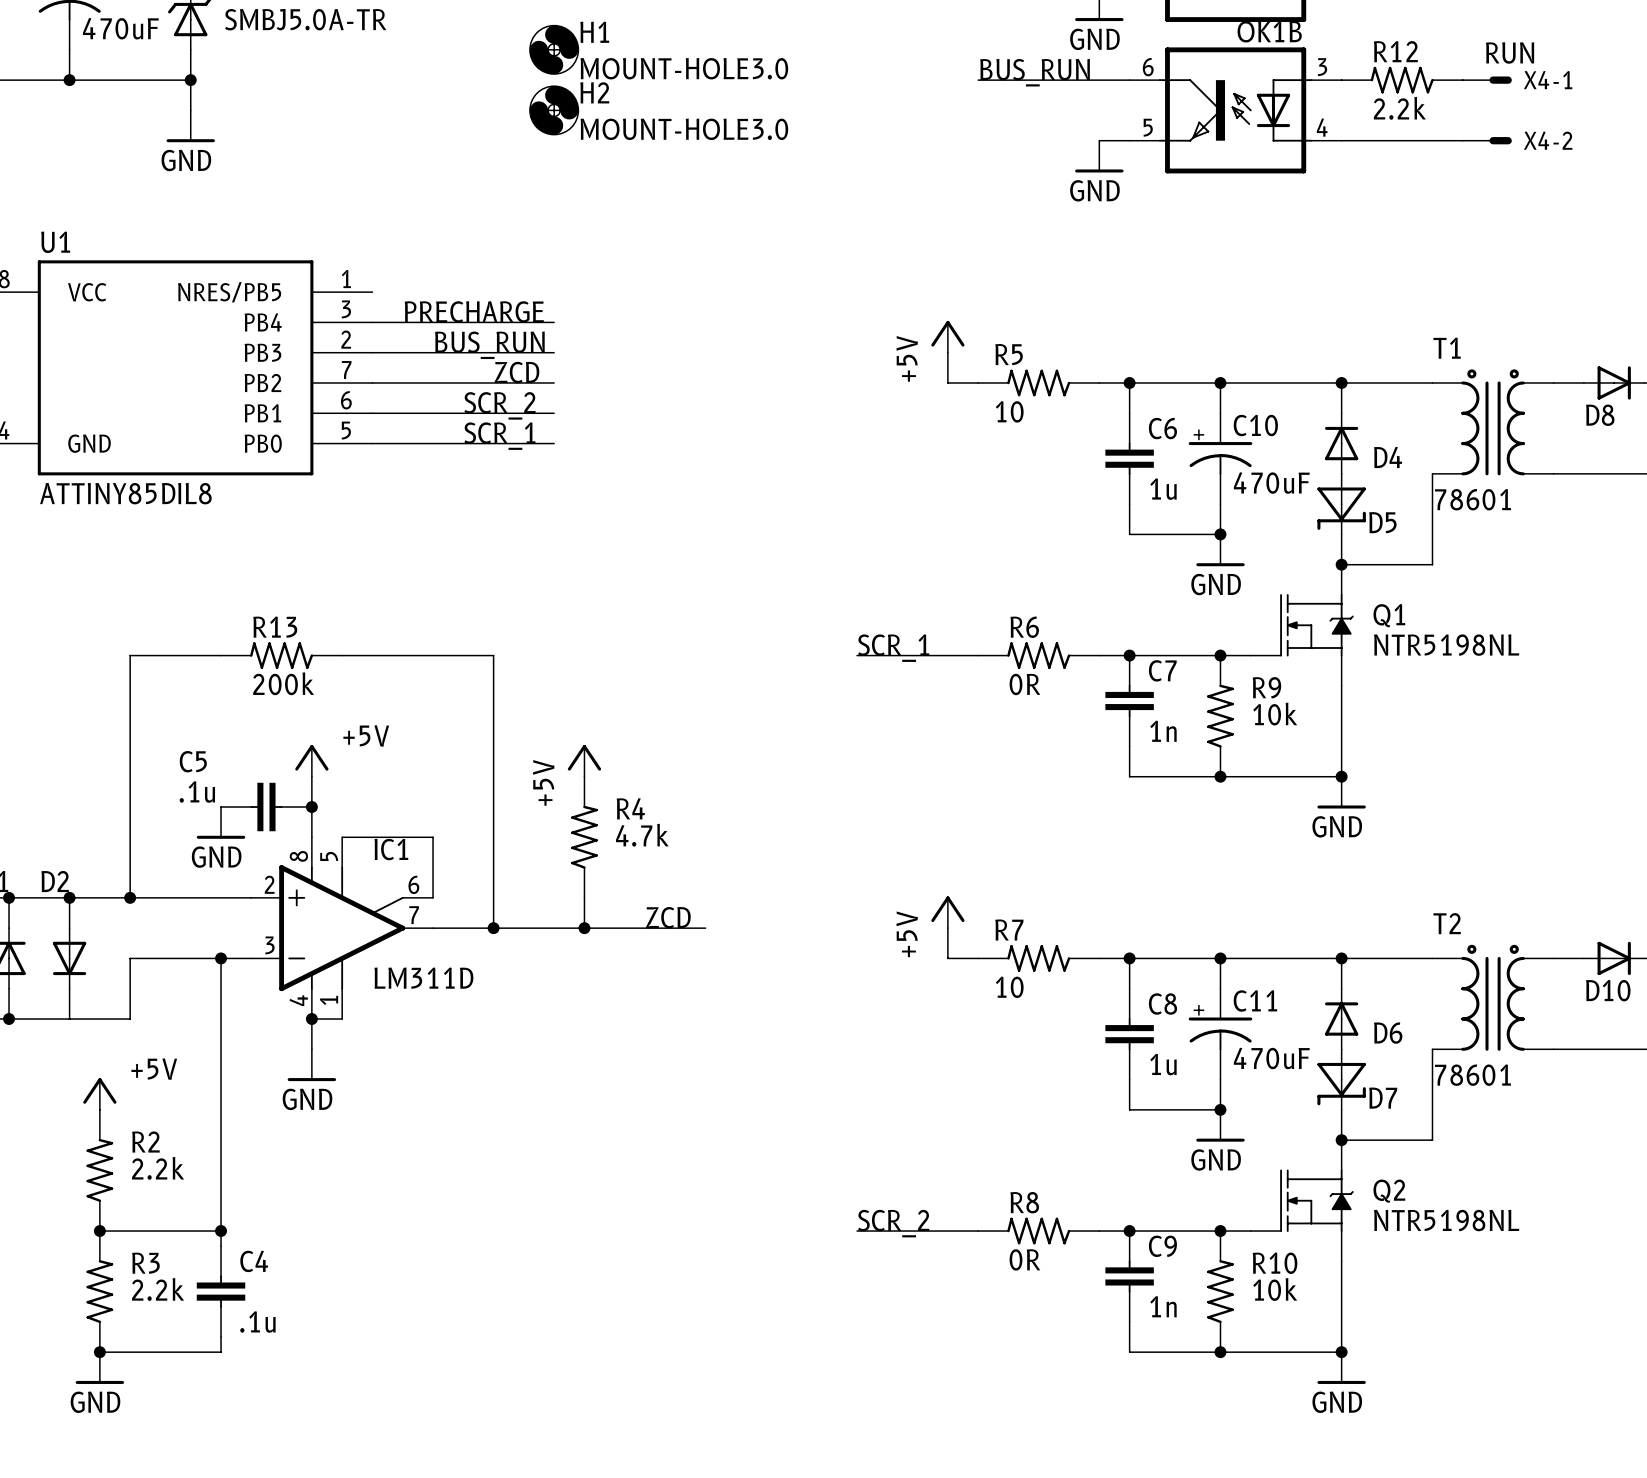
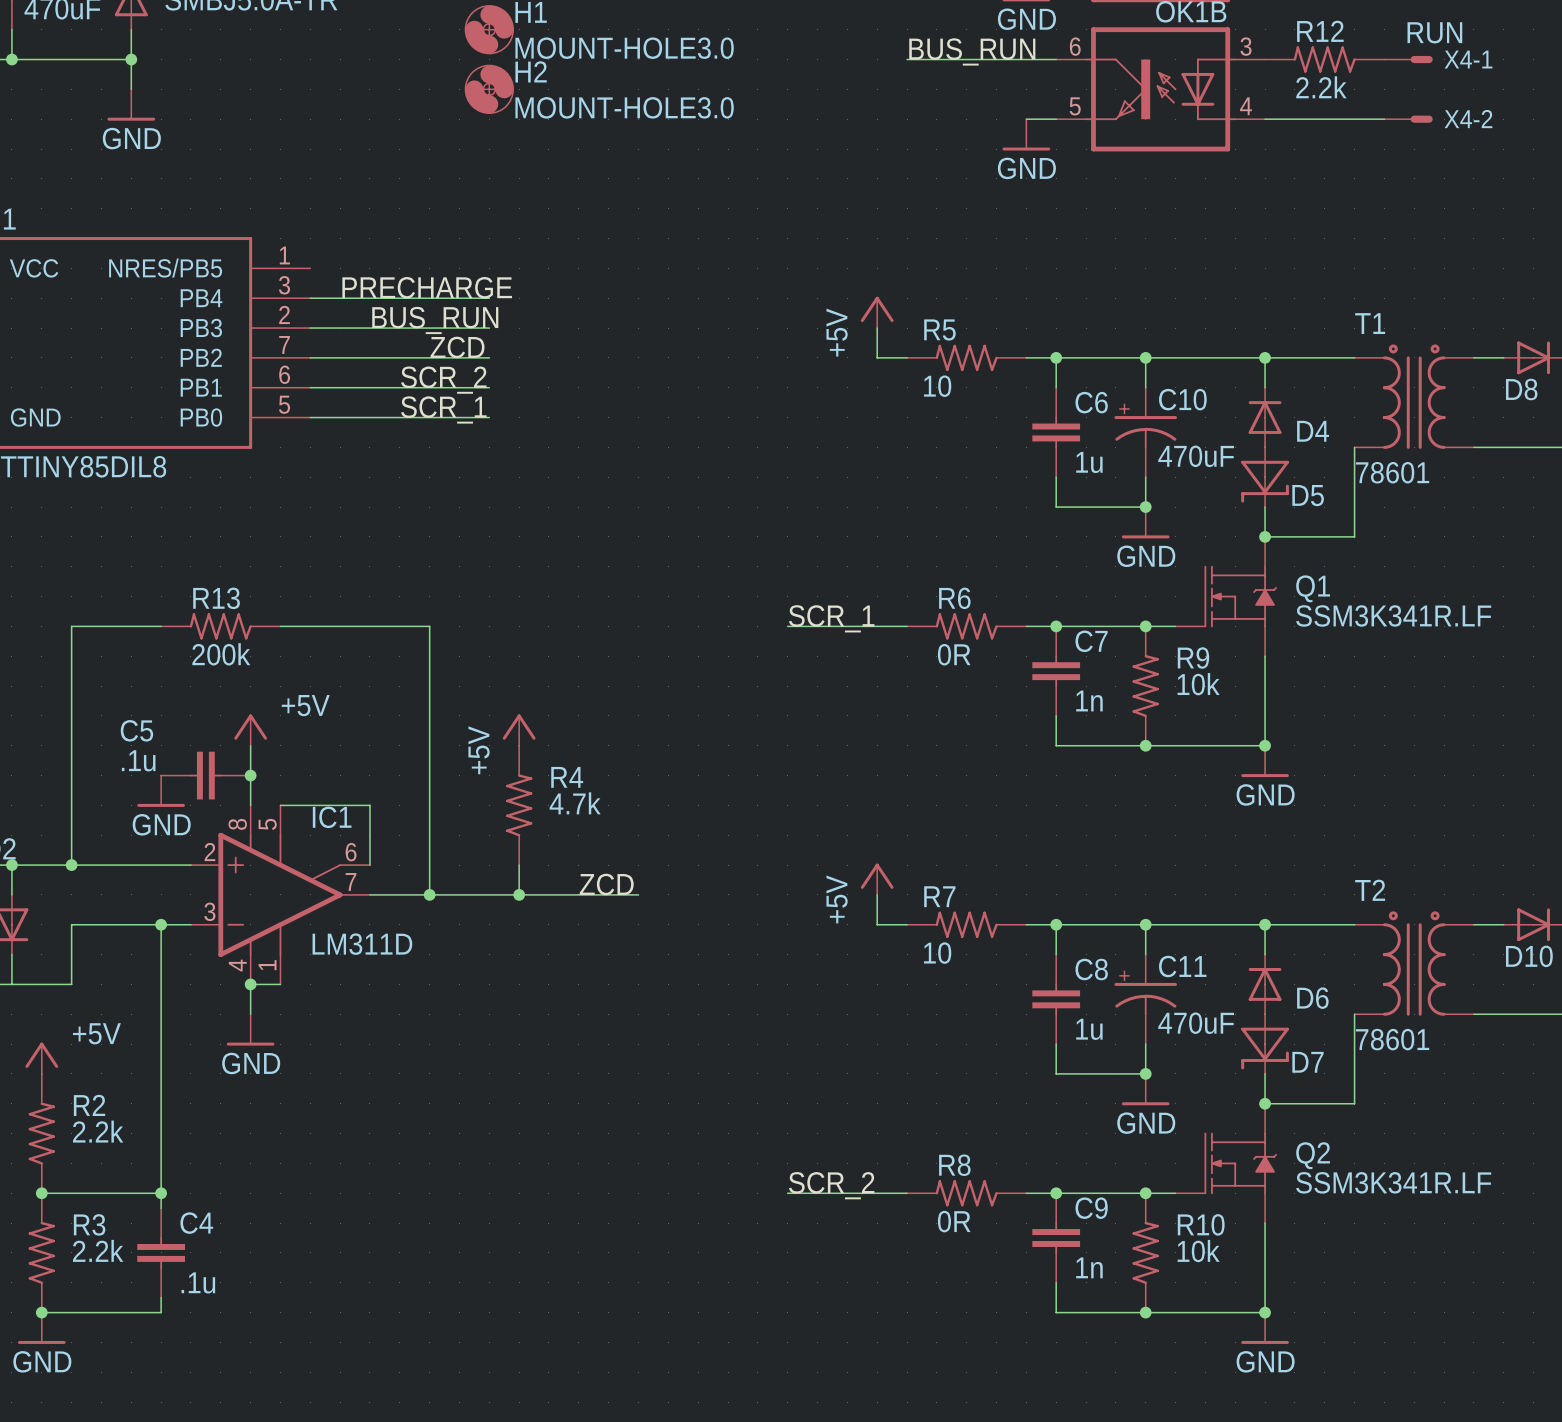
Q1 value: NTR5198NL (1446, 645) -> SSM3K341R.LF (1393, 615)
Q2 value: NTR5198NL (1446, 1220) -> SSM3K341R.LF (1393, 1182)

